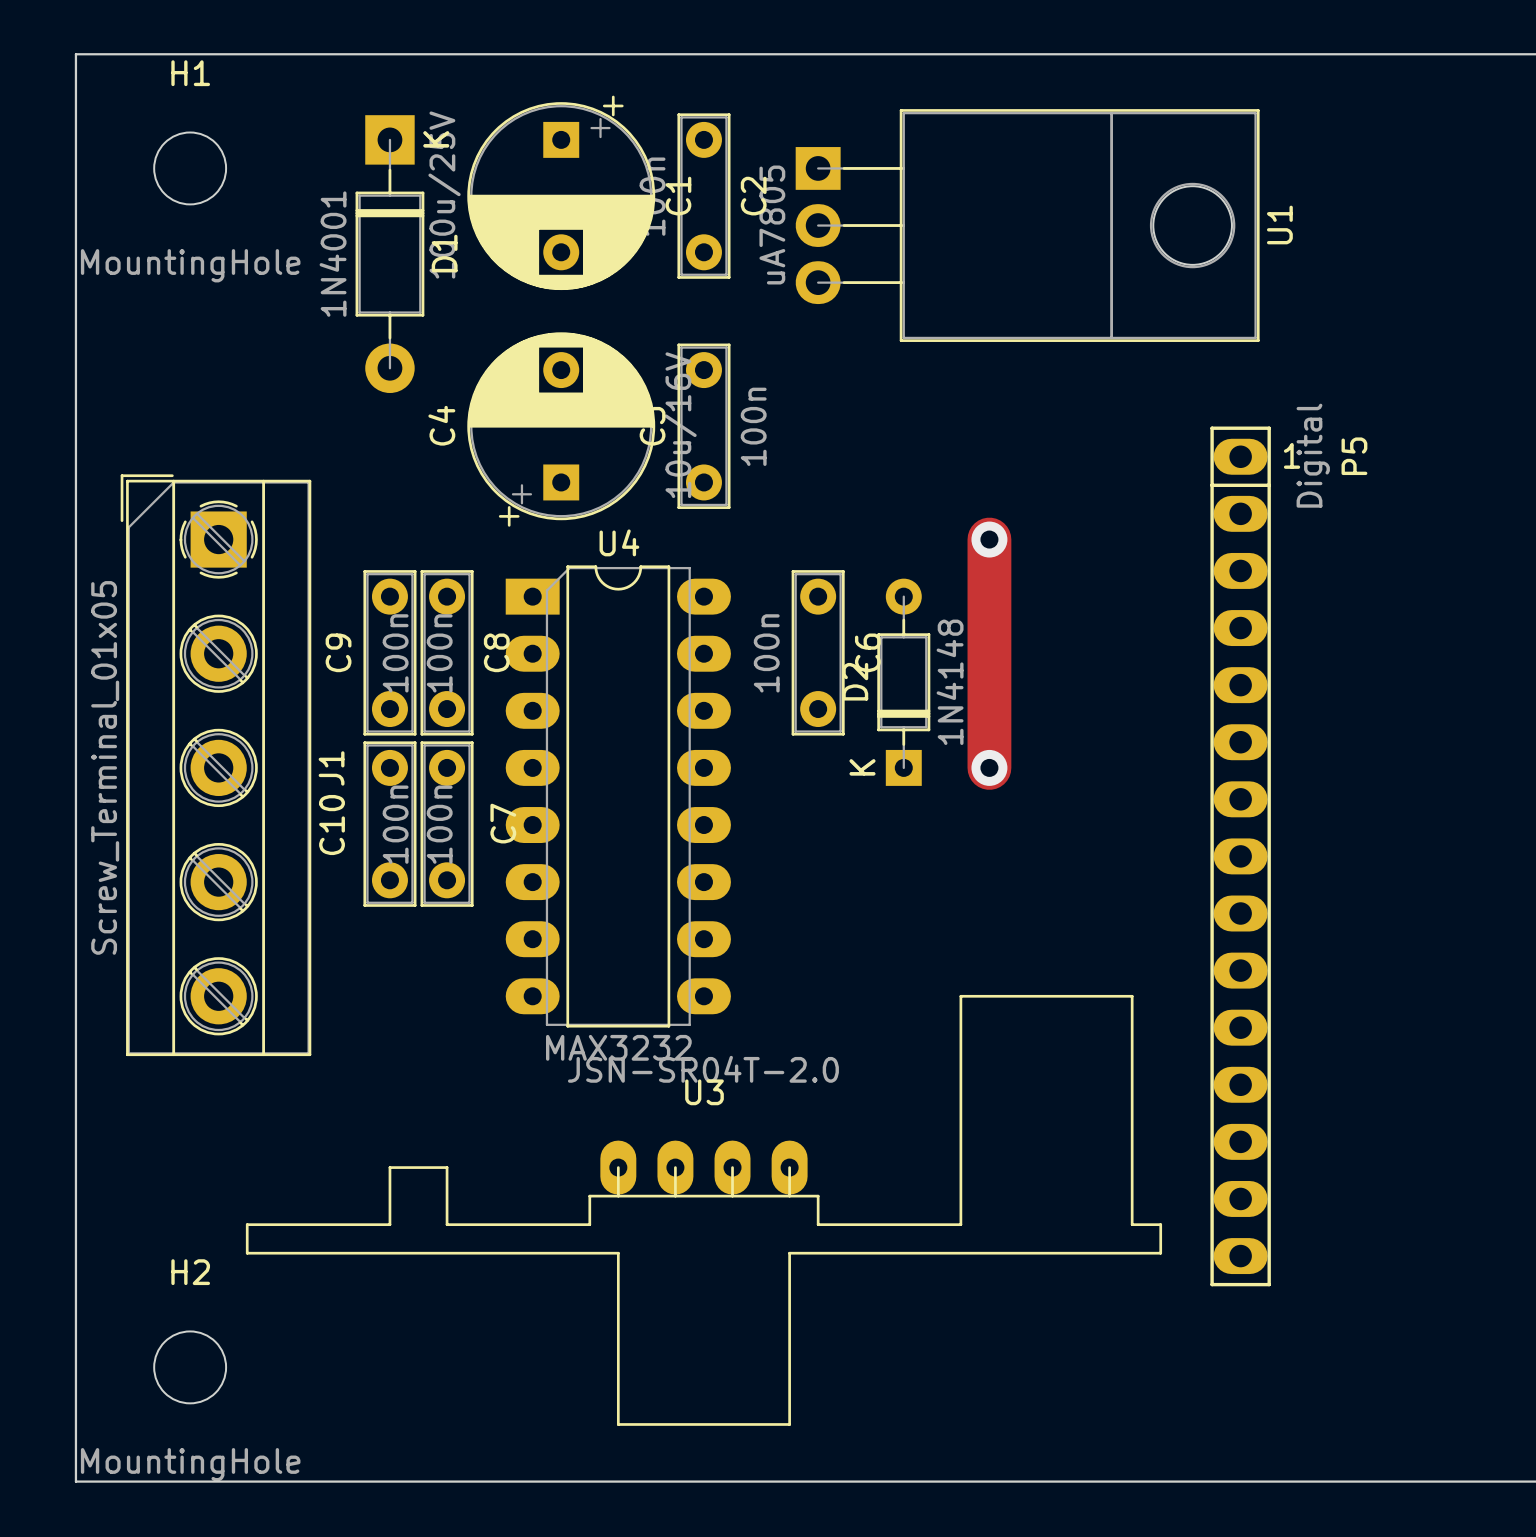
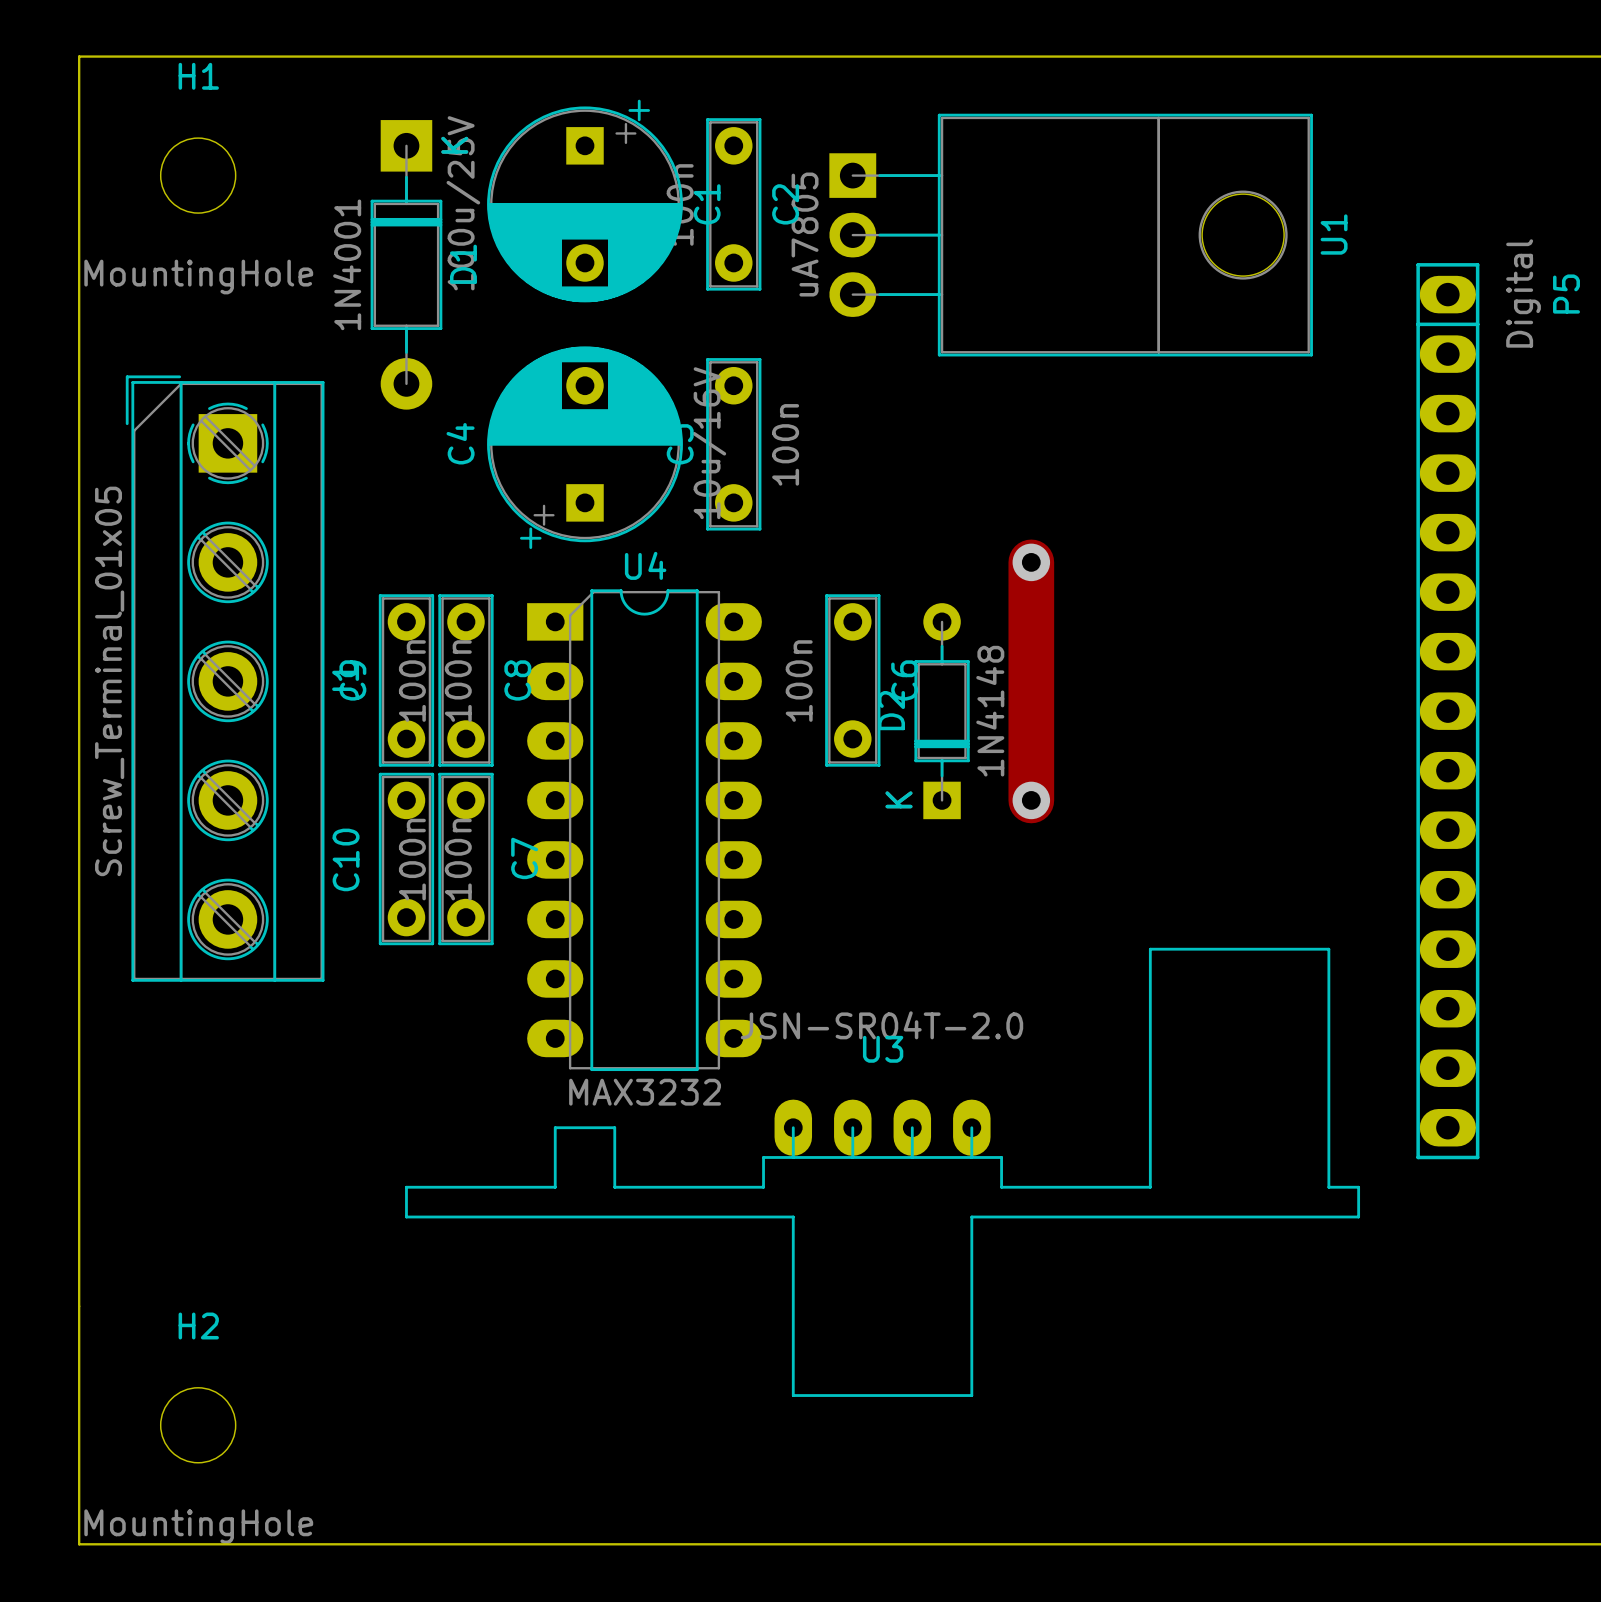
text: 1 (1292, 455) -> none
J1 position: (215, 765) -> (225, 678)
P5 position: (1240, 856) -> (1447, 711)
U3 position: (703, 1210) -> (882, 1172)

